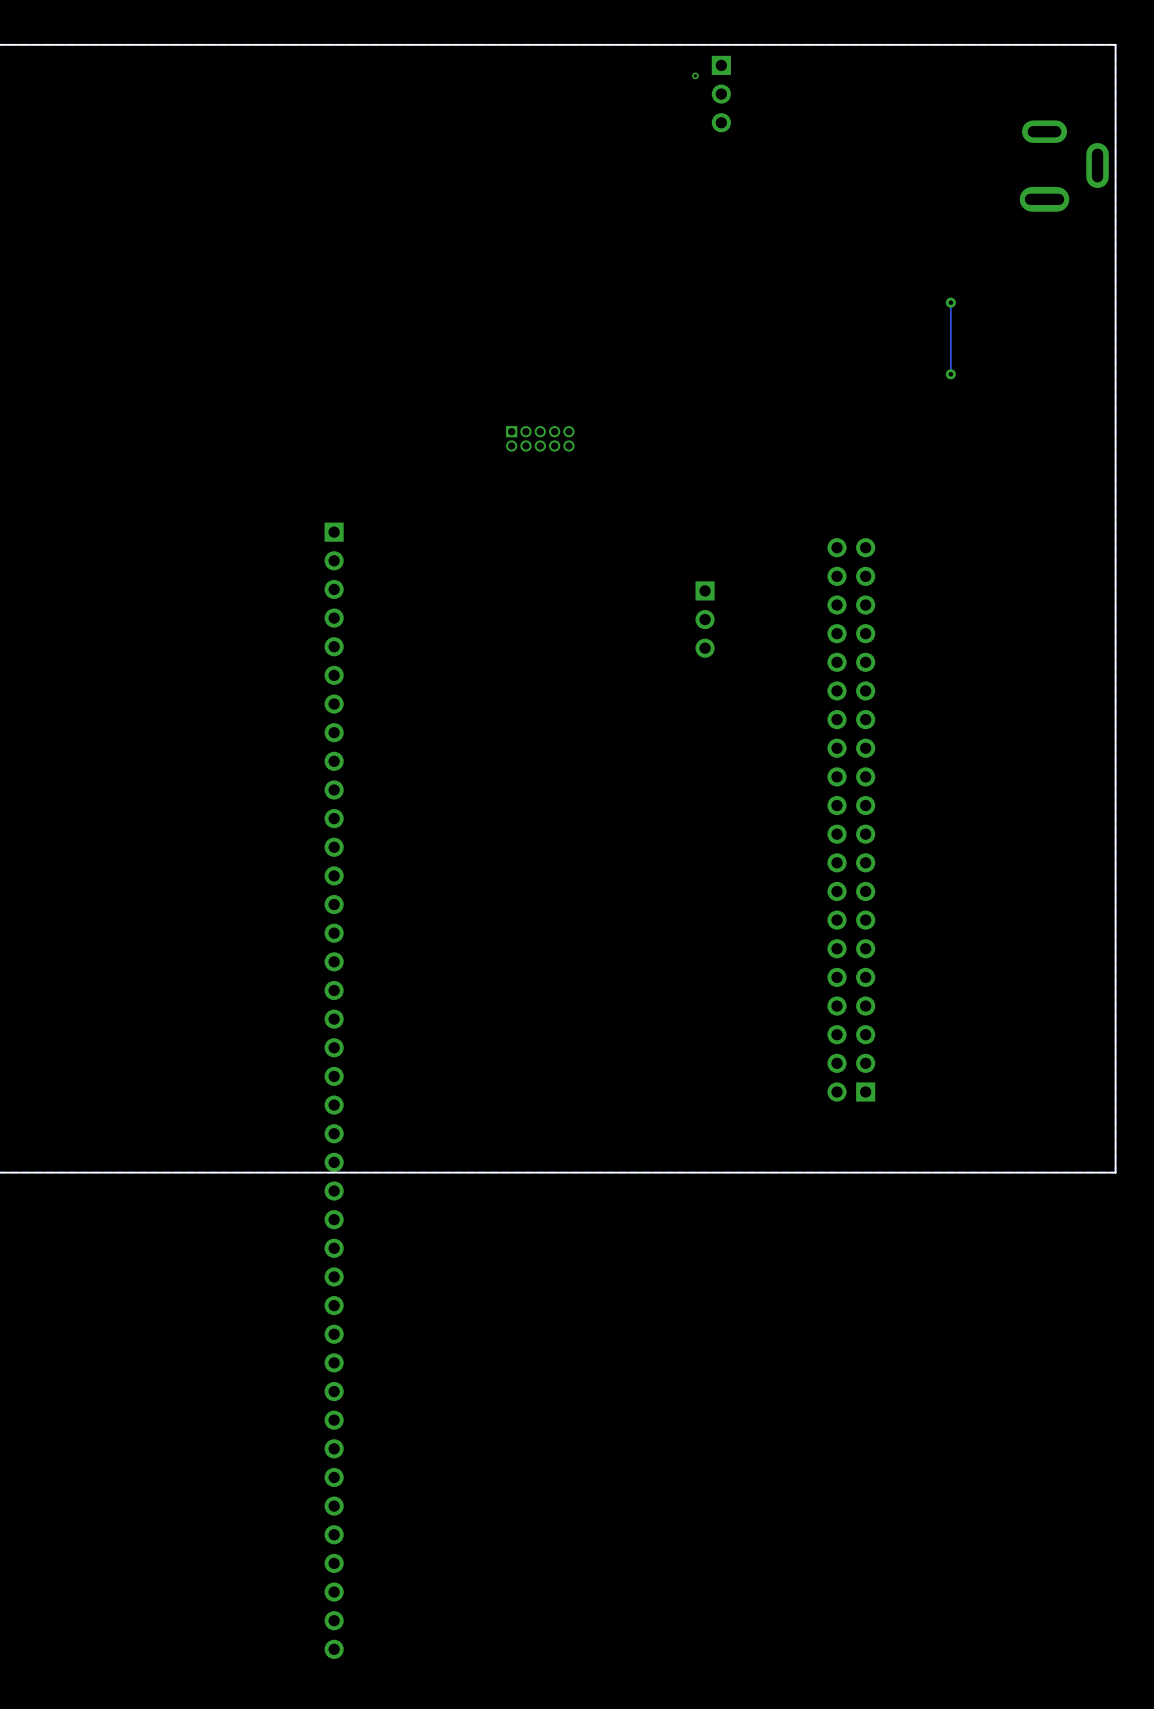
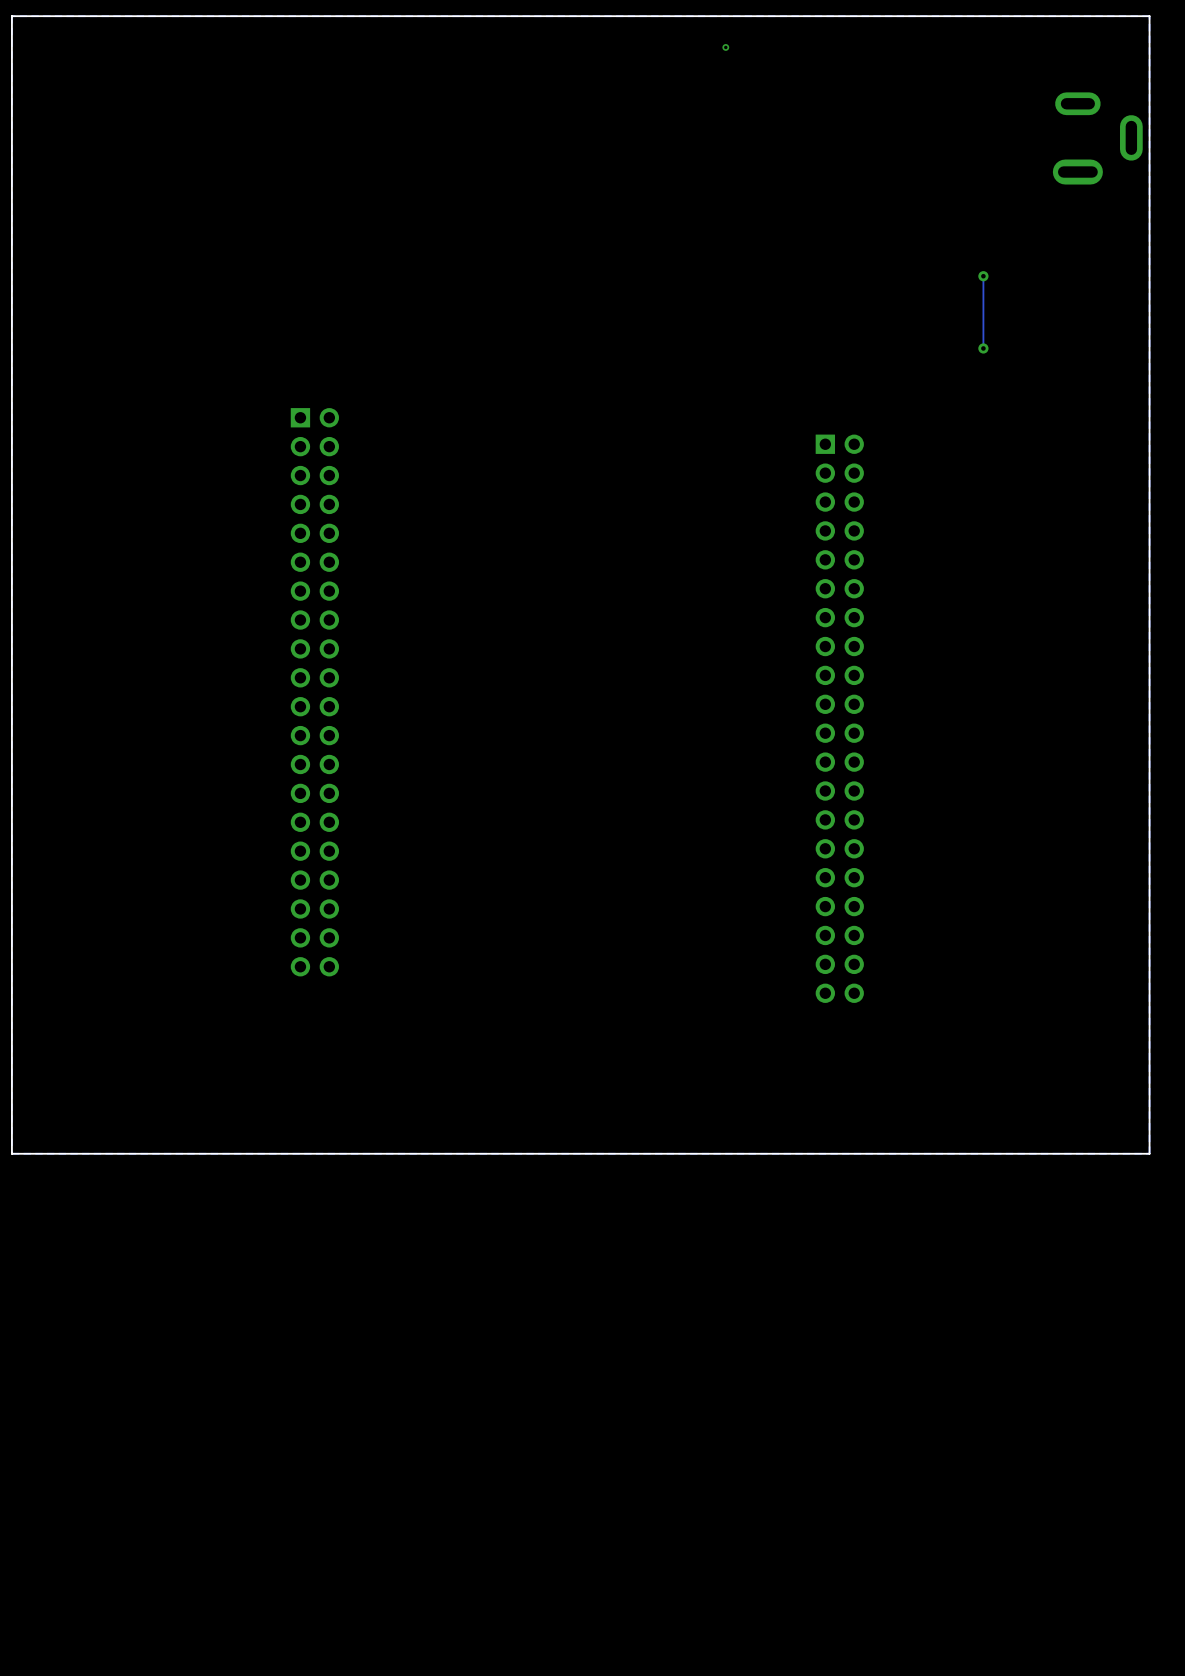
part: (721, 94) -> none
part: (540, 438) -> none
part: (705, 619) -> none
part: none -> (314, 692)
part rotation: 0° (851, 819) -> 180° (839, 718)
part: (334, 1090) -> none

